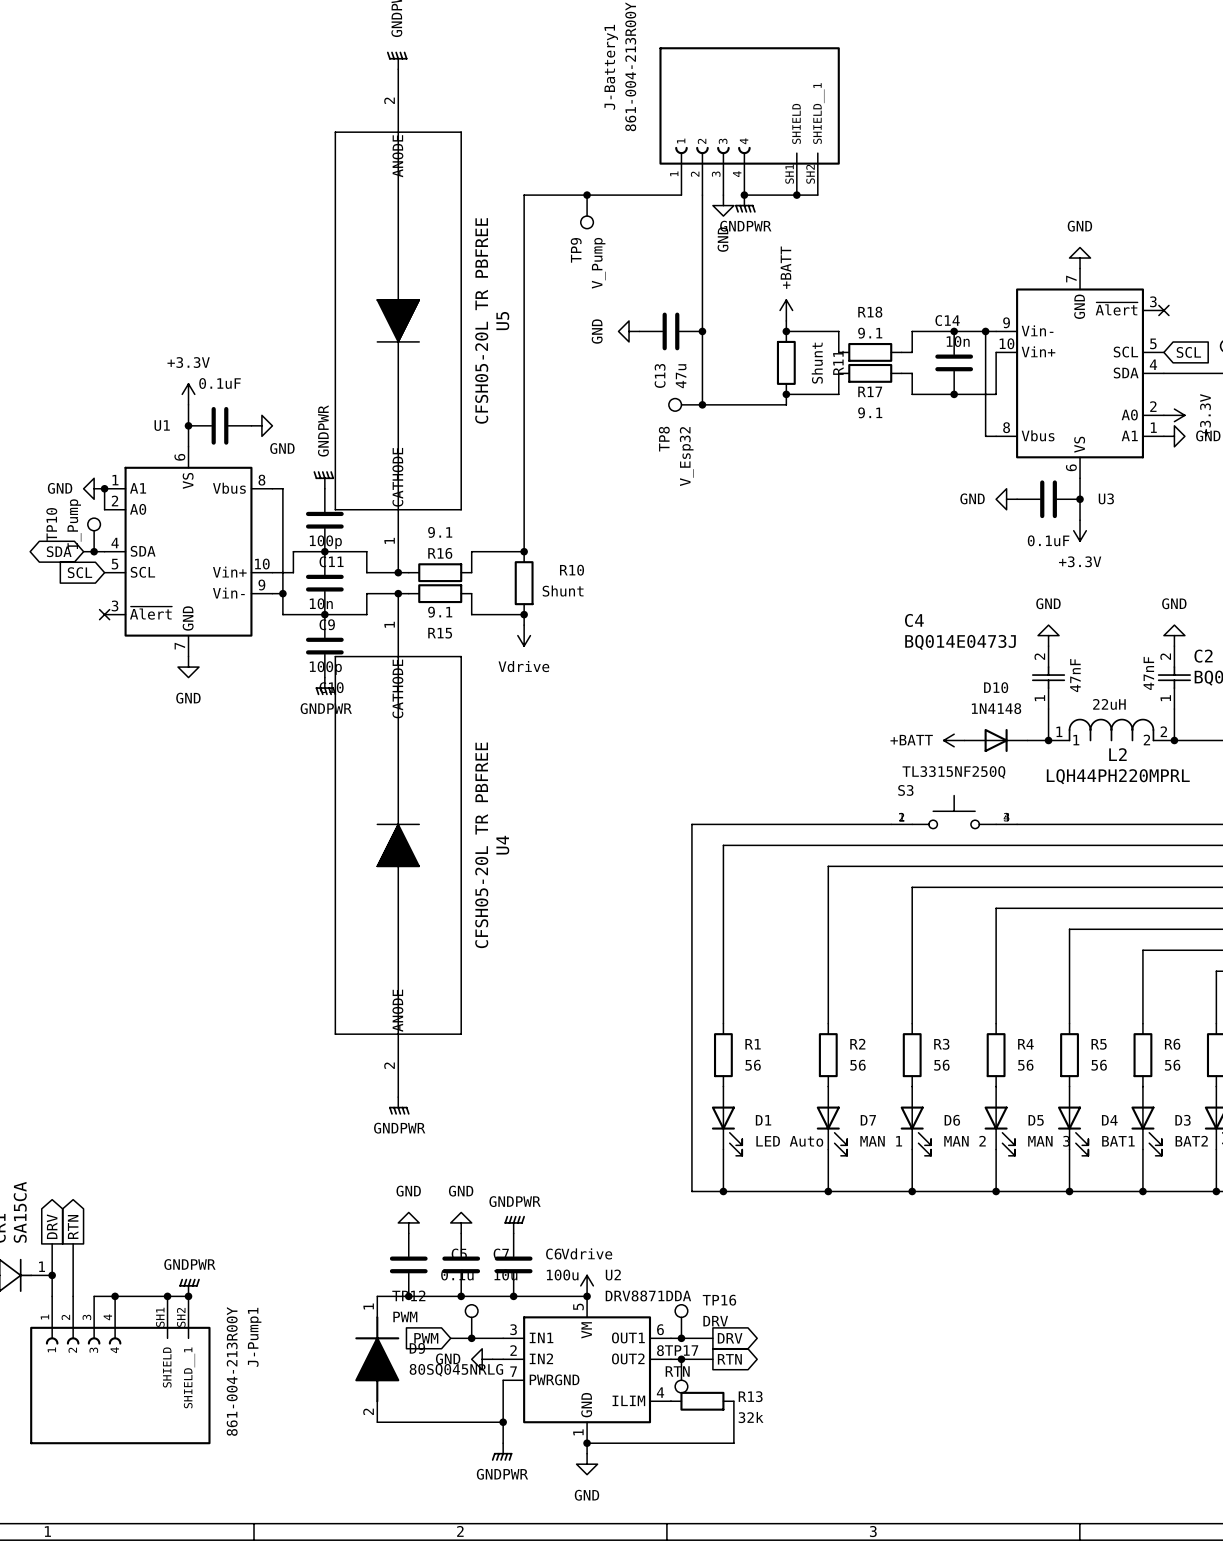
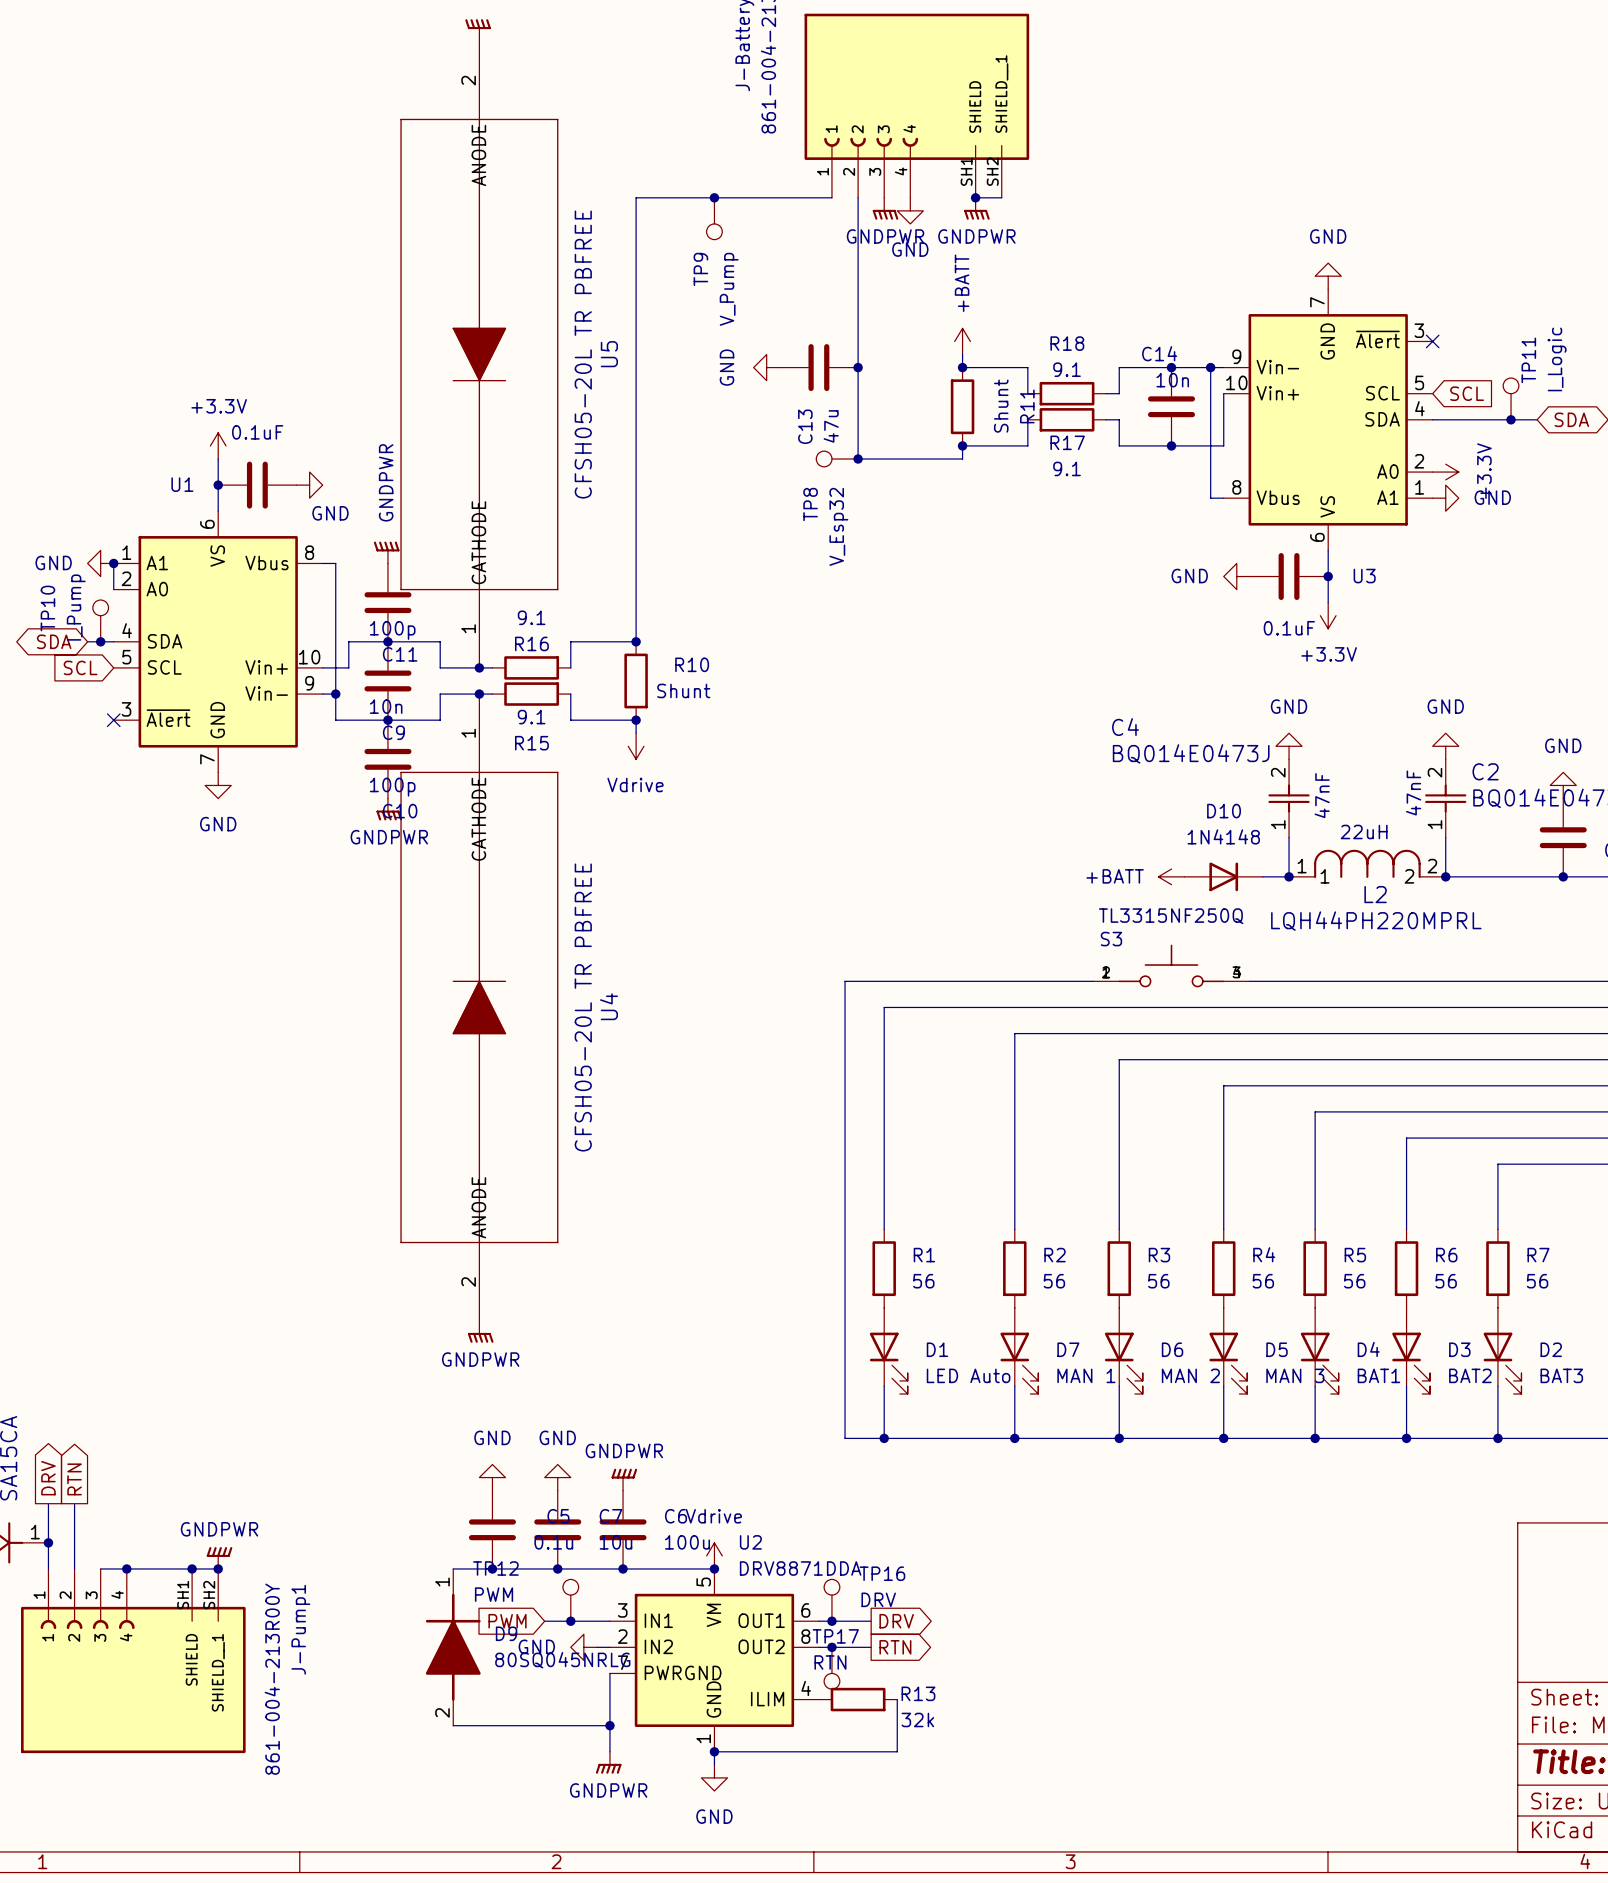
wire: (744, 195) (796, 195) -> none
junction: (744, 195) -> none
power symbol: GNDPWR (745, 203) -> GND (910, 210)
power symbol: none -> GNDPWR (976, 208)
power symbol: GND (723, 205) -> GNDPWR (885, 208)

